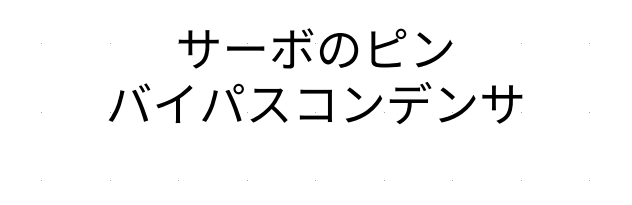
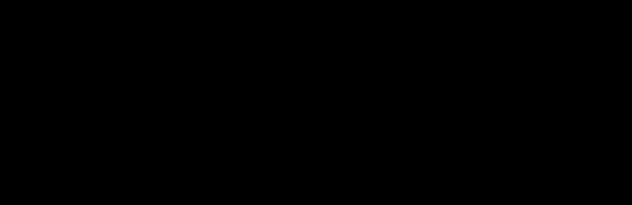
text: サーボのピン (315, 48) -> none
text: バイパスコンデンサ (315, 103) -> none

